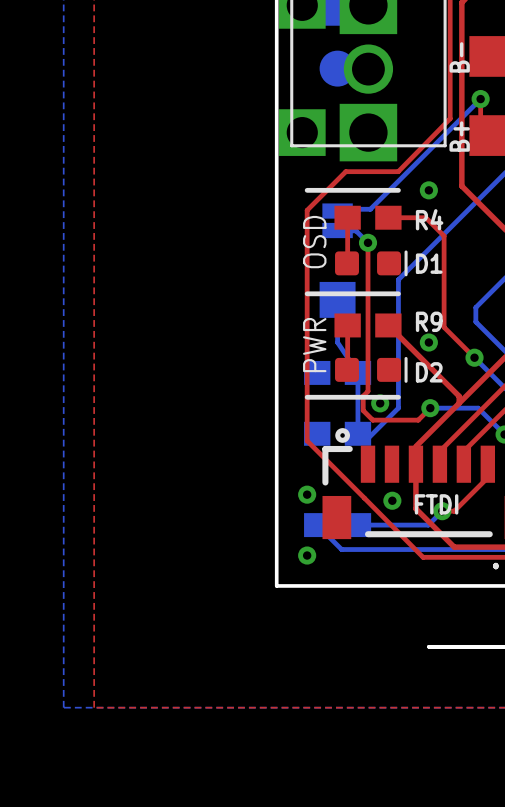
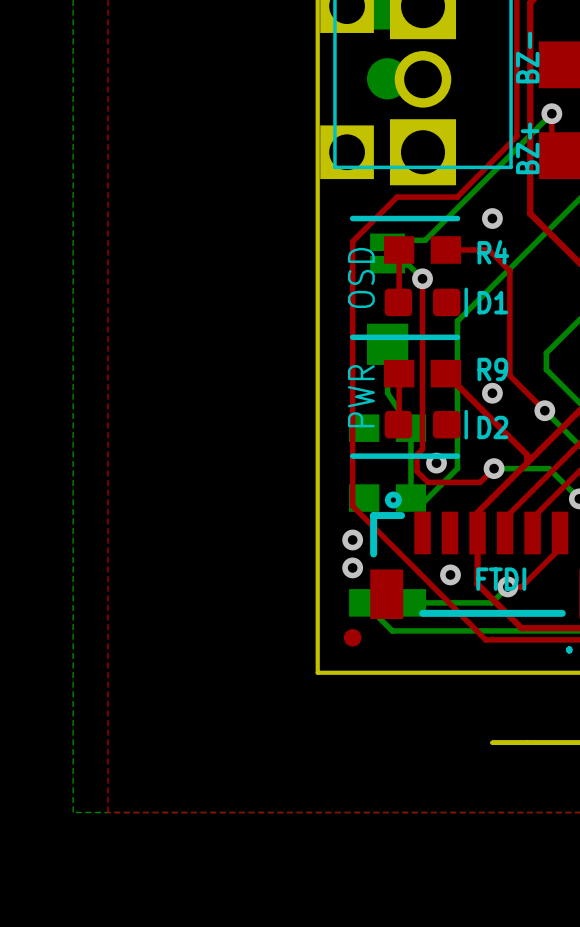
B- name: B- (459, 57) -> BZ- (527, 57)
B+ name: B+ (459, 136) -> BZ+ (527, 148)
part: none -> (352, 637)
via position: (307, 555) -> (352, 539)

